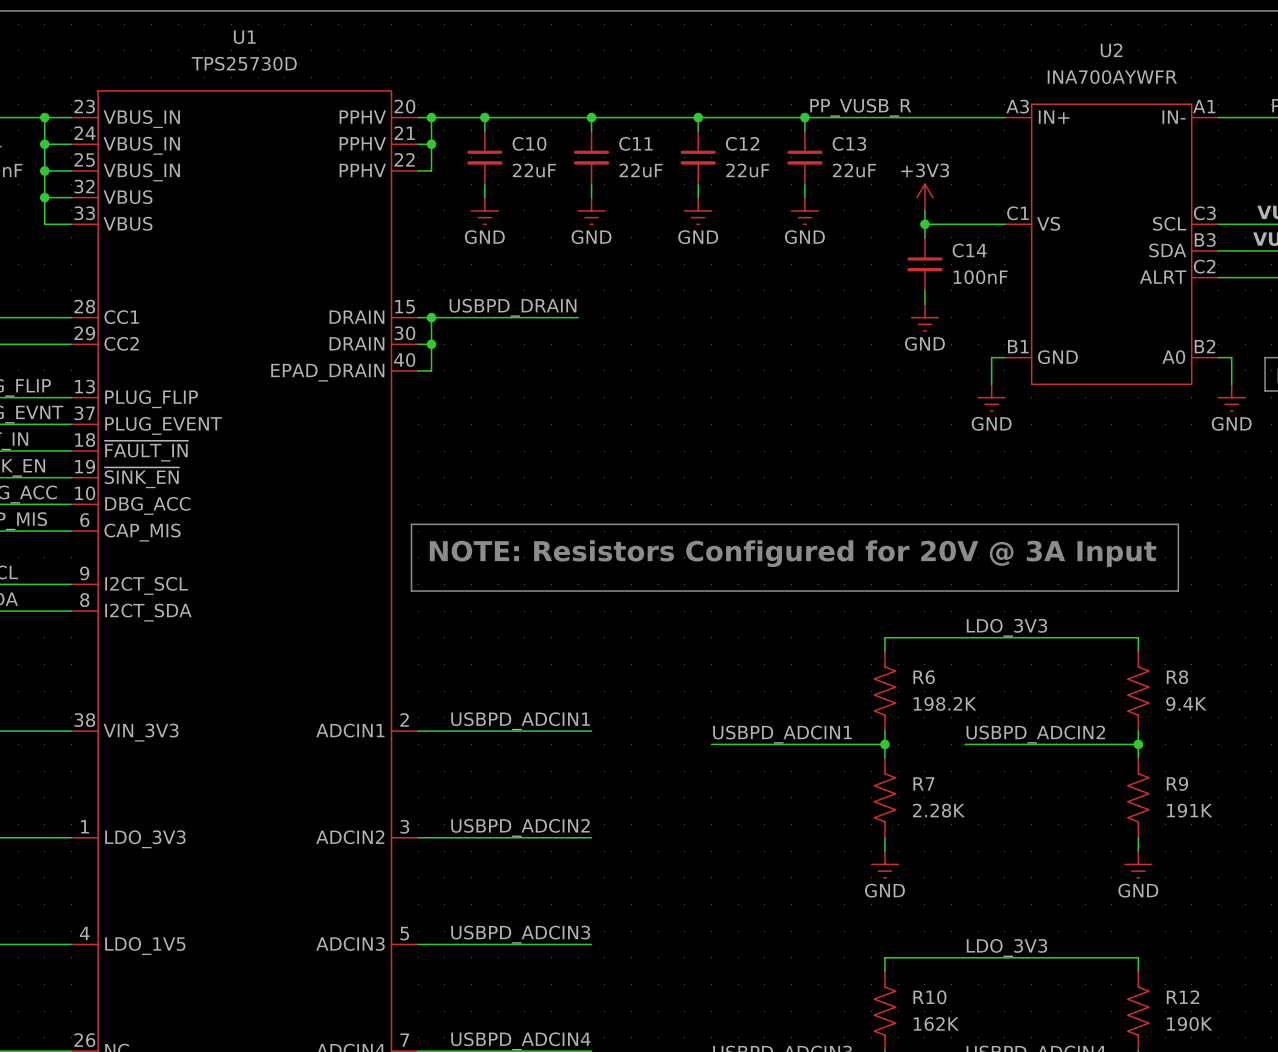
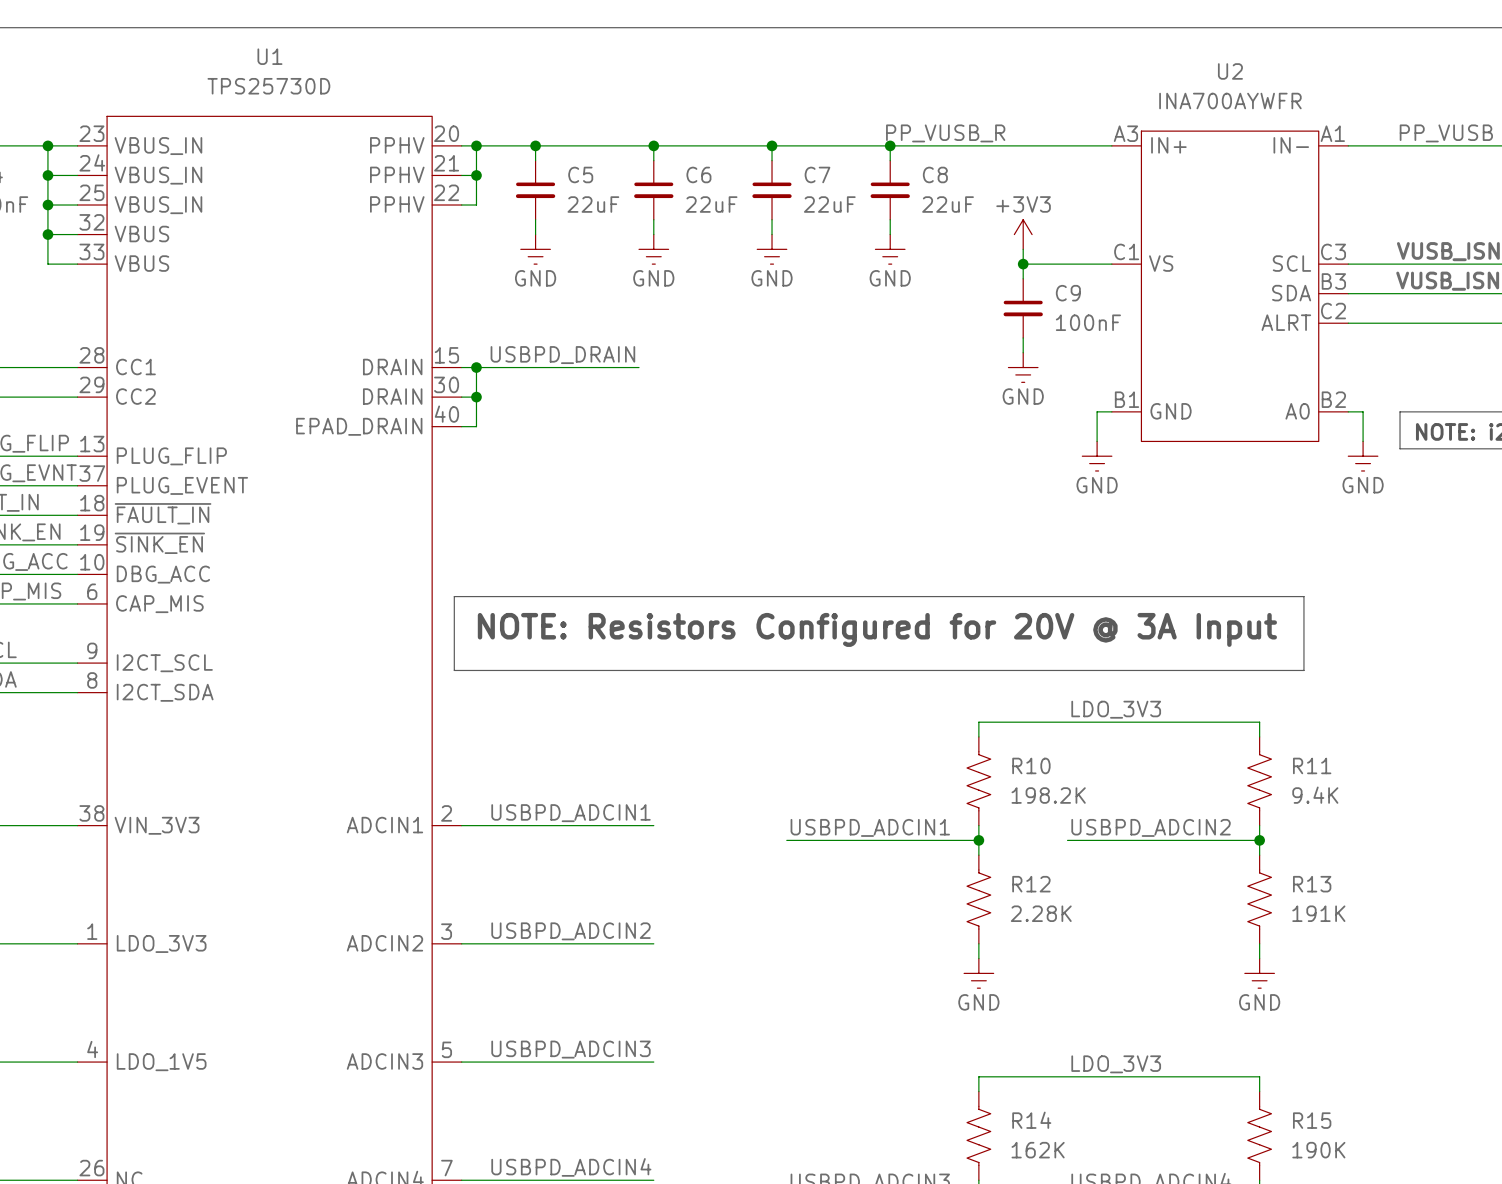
C10 name: C10 (529, 143) -> C5 (580, 174)
C11 name: C11 (635, 143) -> C6 (698, 174)
C12 name: C12 (742, 143) -> C7 (817, 174)
C13 name: C13 (849, 143) -> C8 (935, 174)
C14 name: C14 (969, 250) -> C9 (1068, 293)
R6 name: R6 (924, 677) -> R10 (1031, 765)
R8 name: R8 (1177, 677) -> R11 (1312, 765)
R7 name: R7 (923, 783) -> R12 (1031, 884)
R9 name: R9 (1177, 783) -> R13 (1312, 884)
R10 name: R10 (929, 997) -> R14 (1031, 1120)
R12 name: R12 (1183, 997) -> R15 (1312, 1120)

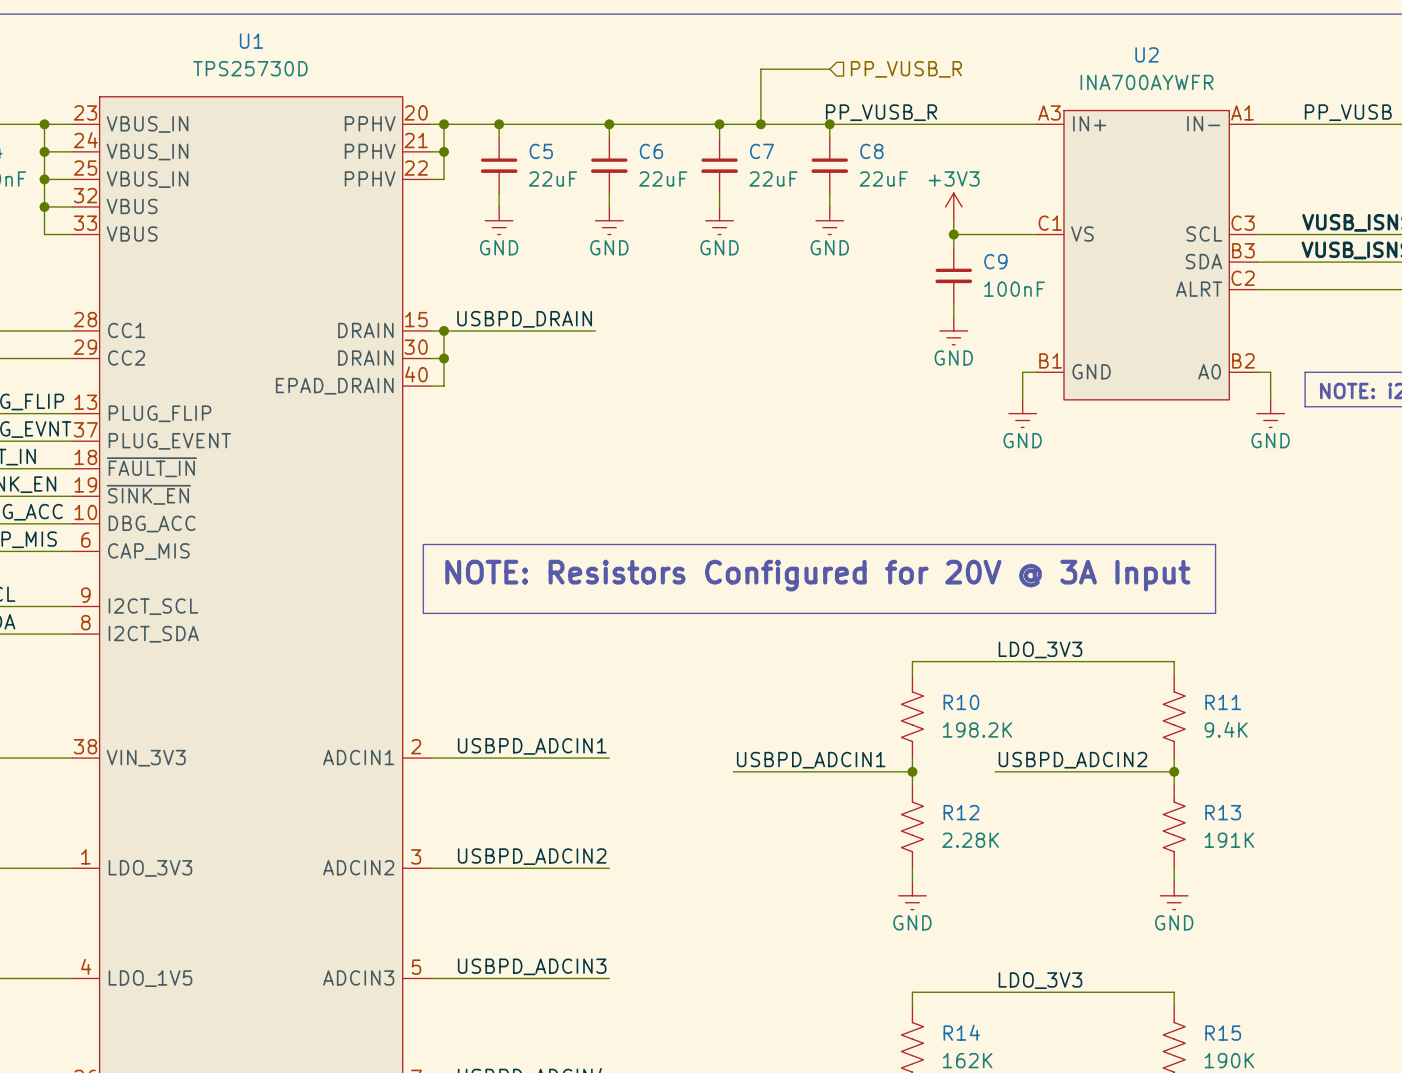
wire: none -> (829, 69) (760, 69) (760, 124)
hierarchical label: none -> PP_VUSB_R (906, 69)
junction: none -> (760, 124)

